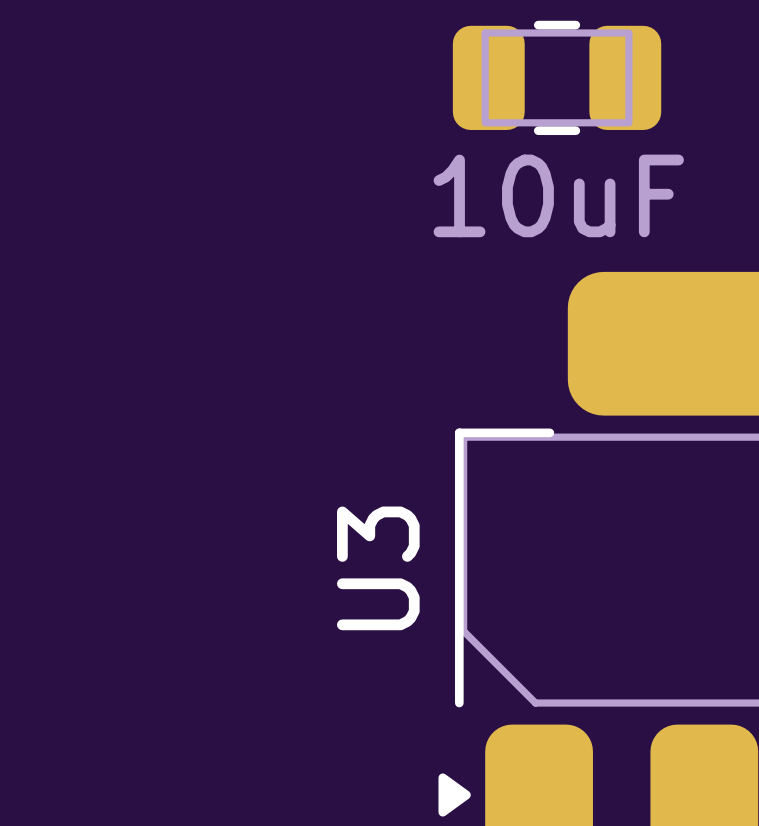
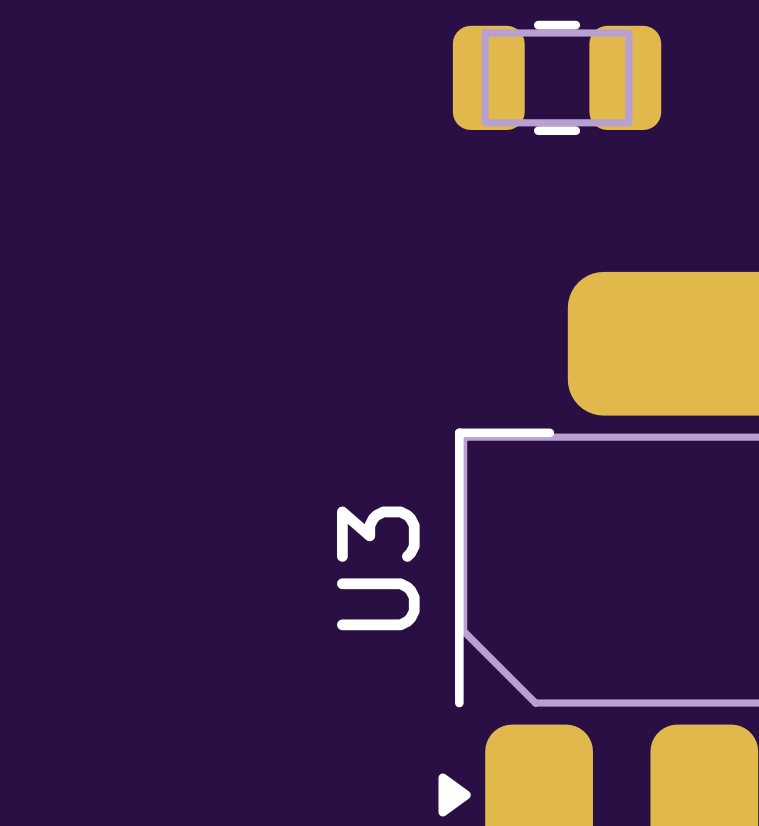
part value: 10uF (558, 195) -> none

